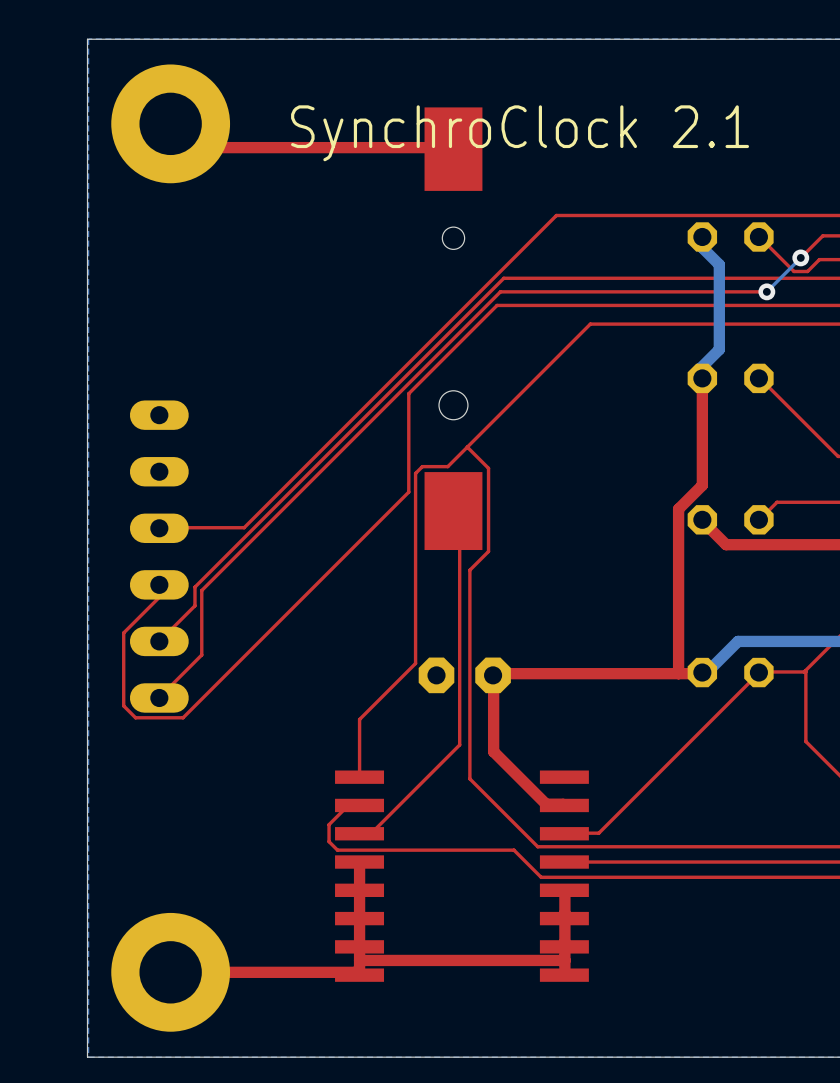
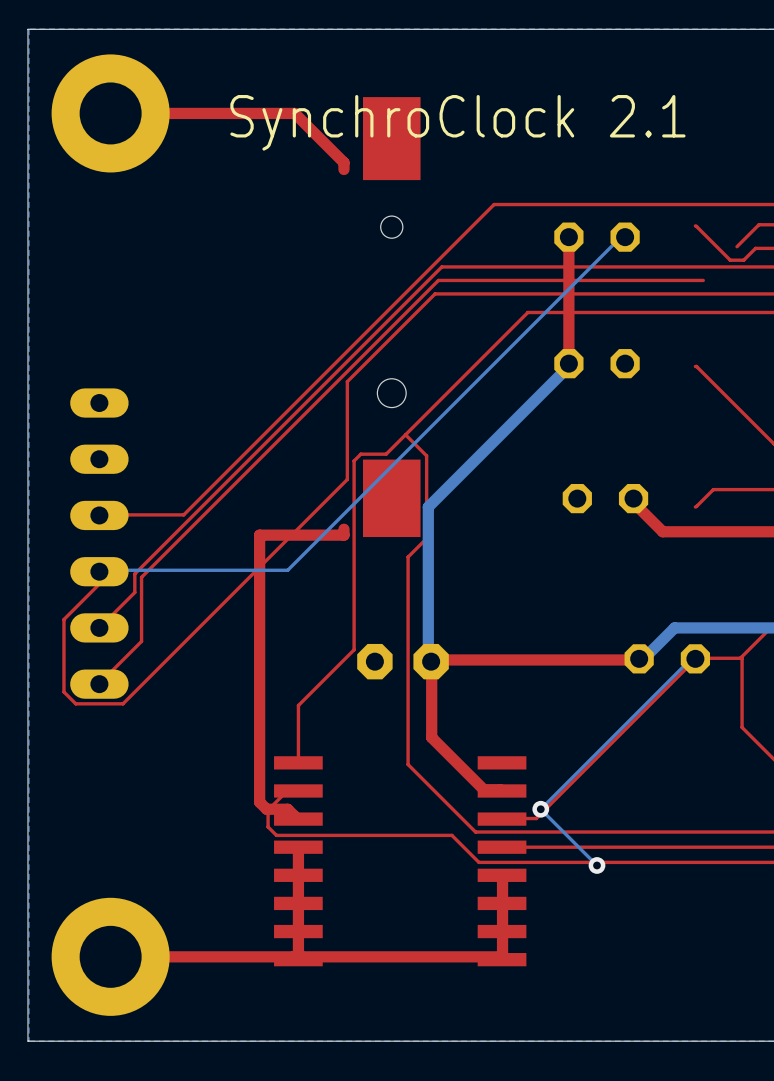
top track: (171, 123) (194, 147) (452, 147) (453, 149) -> (111, 113) (294, 113) (343, 162) (343, 169)
bottom track: (702, 236) (702, 247) (719, 264) (719, 349) (700, 368) (702, 378) -> none
part position: (730, 236) -> (597, 237)
top track: none -> (568, 237) (568, 363)
bottom track: none -> (625, 237) (625, 232) (287, 570) (99, 571)
bottom track: (800, 257) (766, 291) -> none
via: (800, 257) -> none
via: (766, 291) -> none
bottom track: none -> (568, 363) (568, 366) (428, 507) (428, 661) (431, 661)
top track: (702, 378) (702, 485) (678, 509) (678, 673) -> none
part position: (730, 378) -> (597, 363)
top track: (453, 511) (459, 517) (459, 744) (371, 833) (359, 833) -> (343, 529) (343, 535) (259, 535) (259, 802) (266, 809) (287, 809) (298, 819)
part position: (730, 519) -> (605, 498)
bottom track: none -> (695, 654) (540, 809) (597, 865)
via: none -> (540, 809)
via: none -> (597, 865)
top track: (564, 960) (359, 960) -> none
top track: none -> (498, 956) (301, 956) (298, 959) (294, 956)

